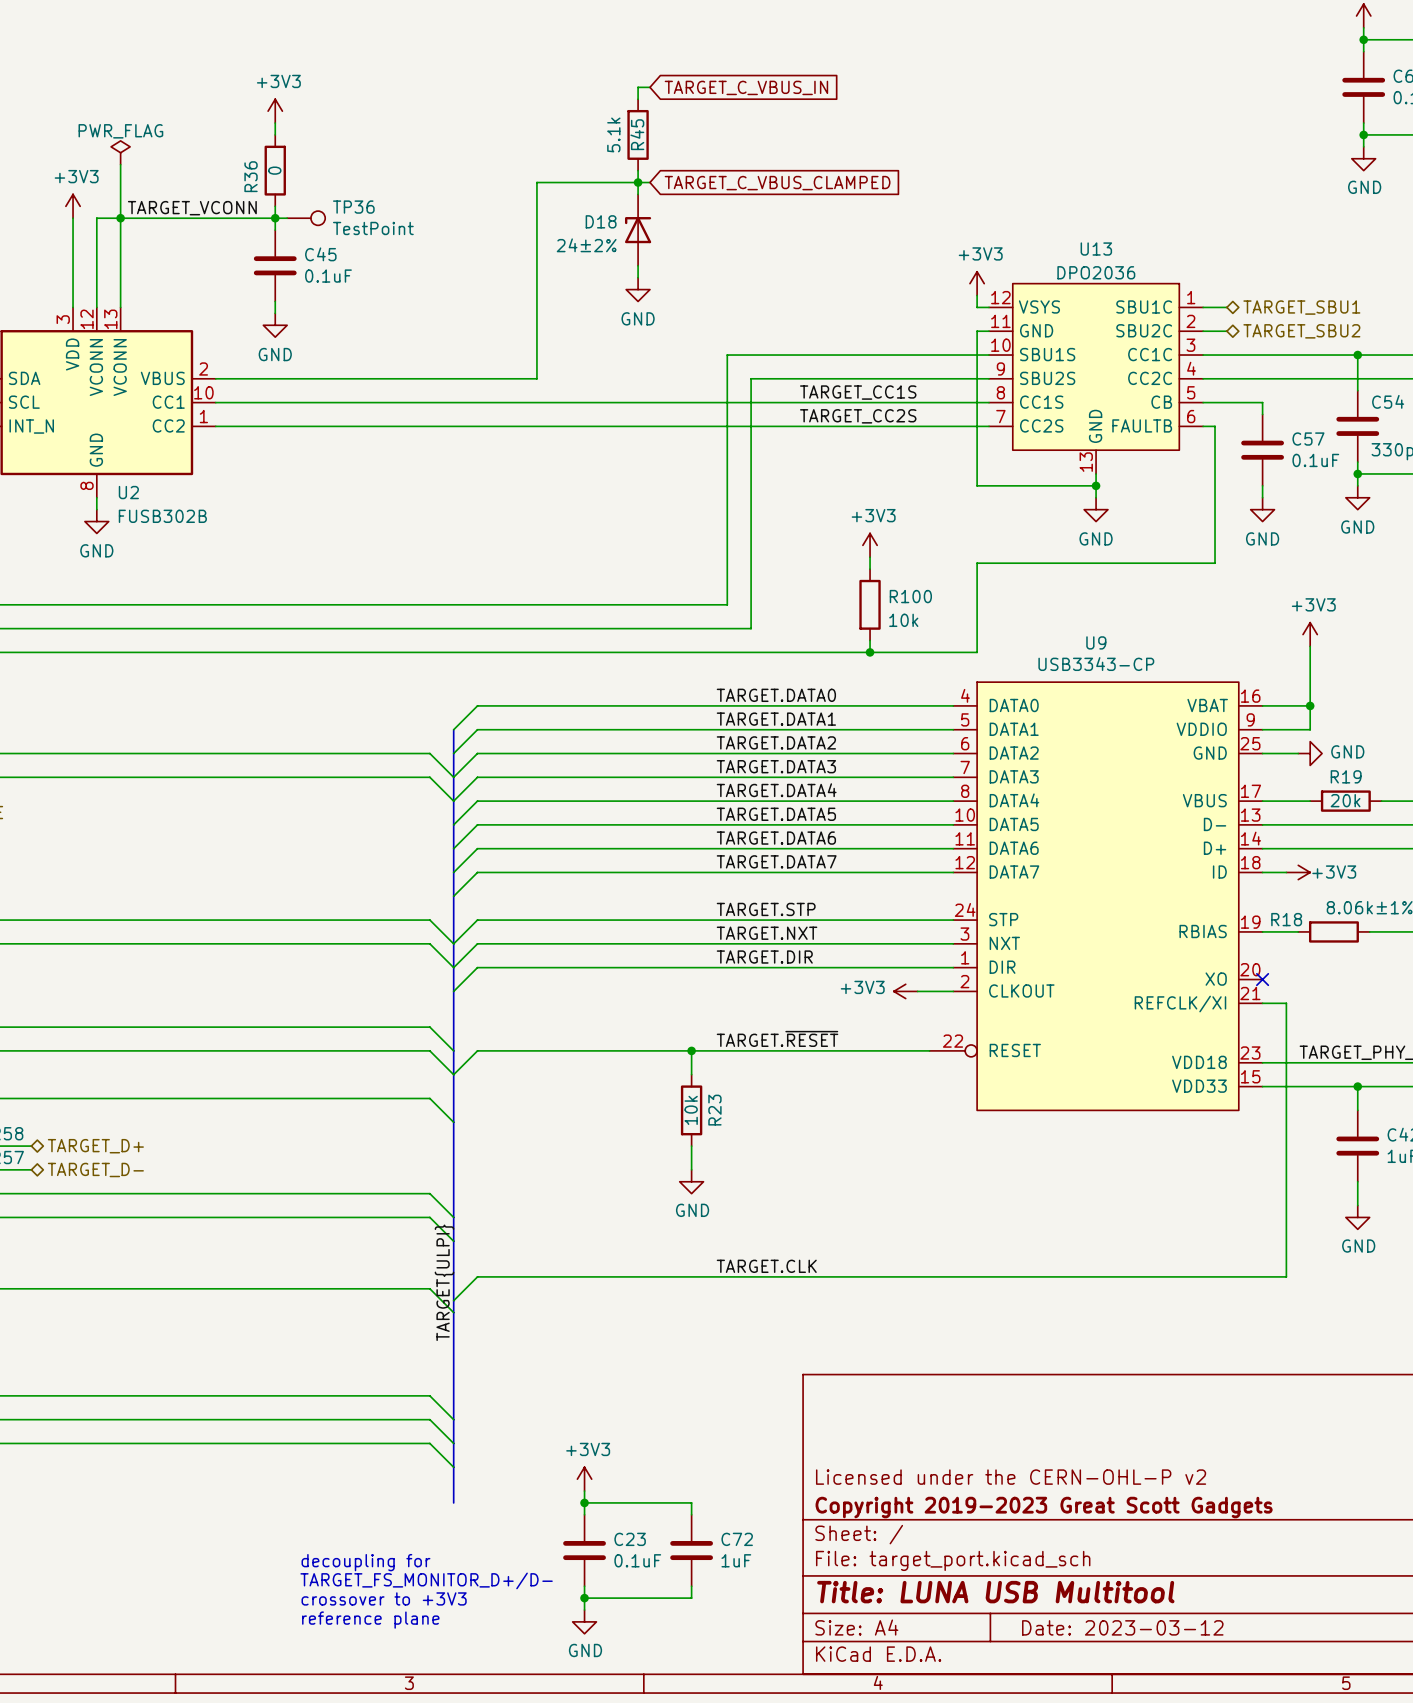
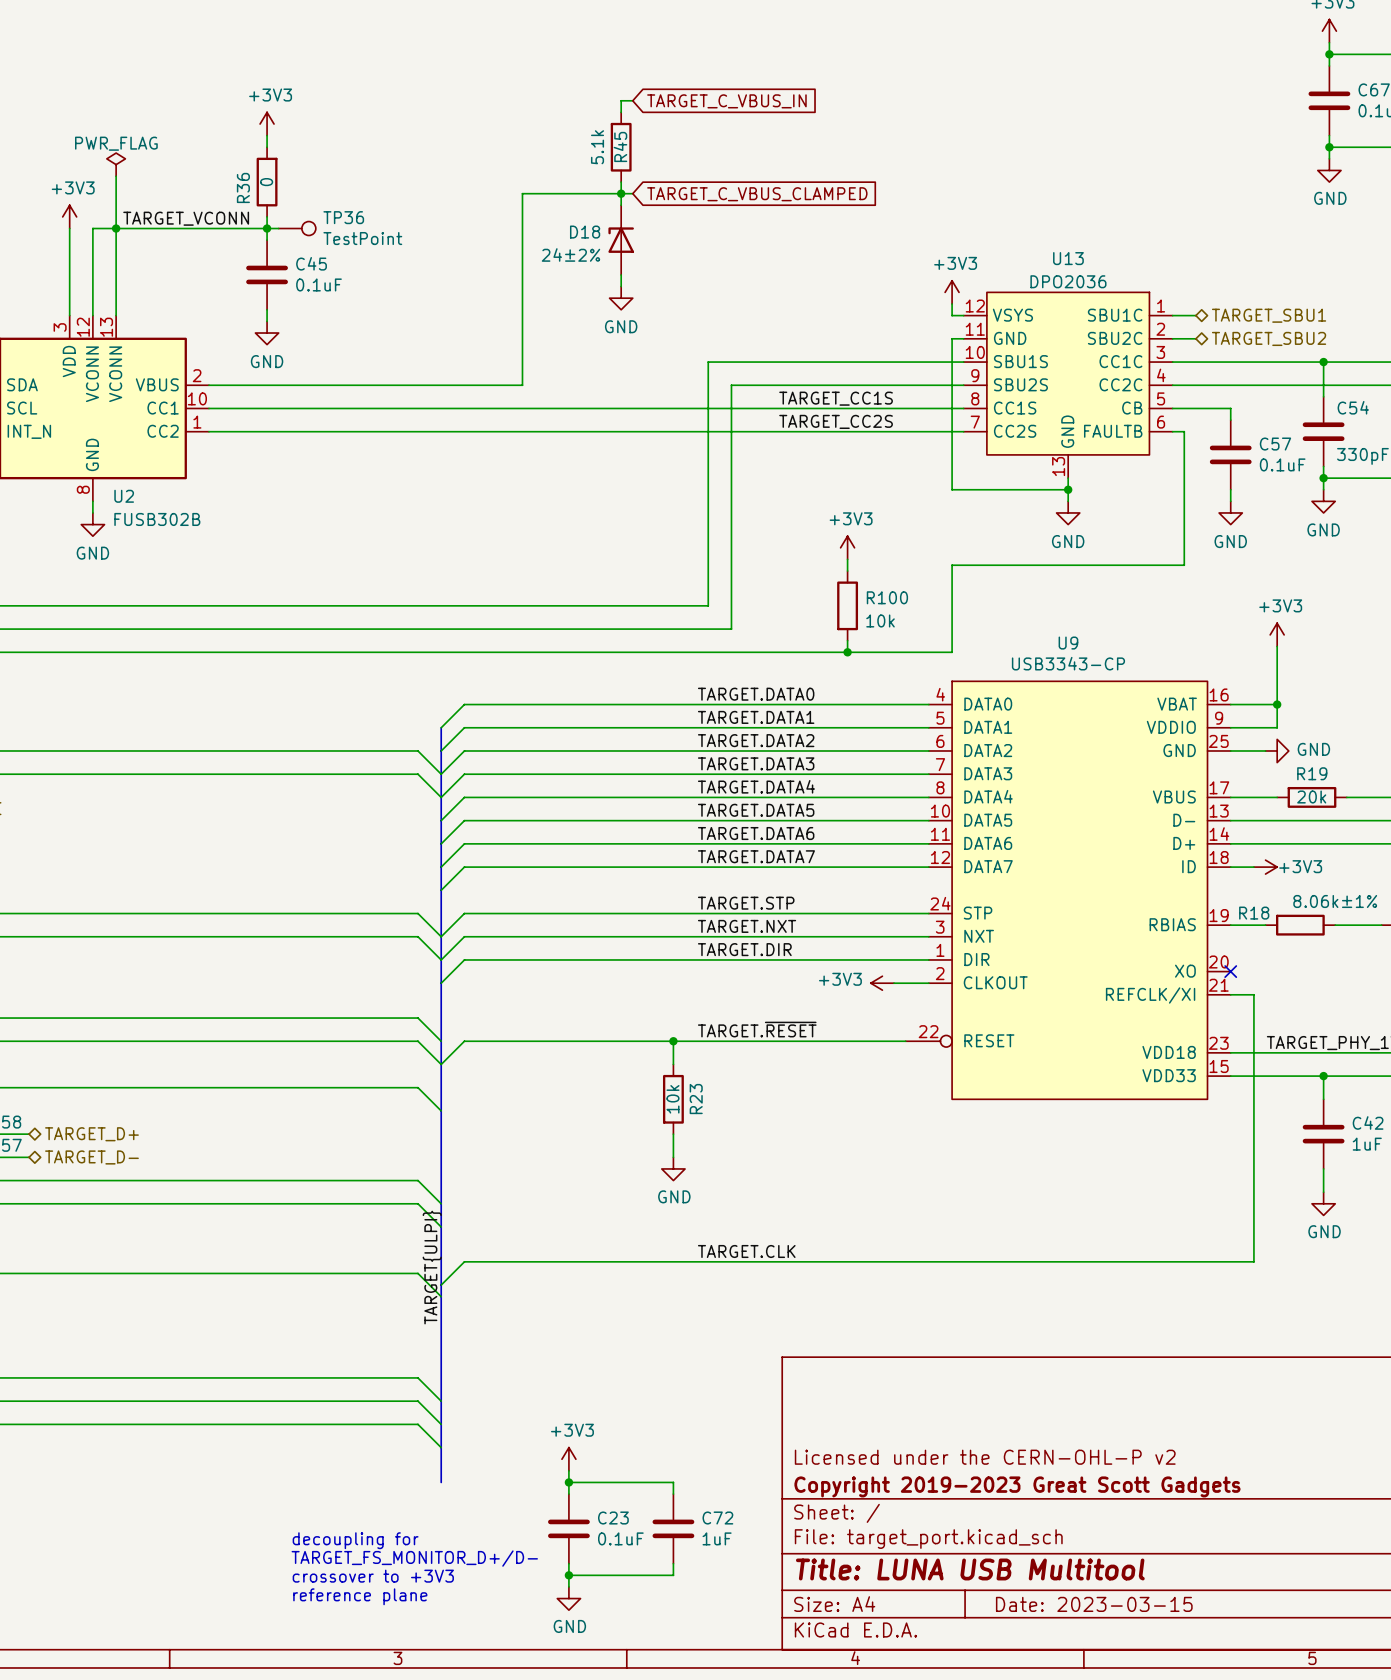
title block: Date: 2023-03-12 (1122, 1627) -> Date: 2023-03-15 (1094, 1604)

